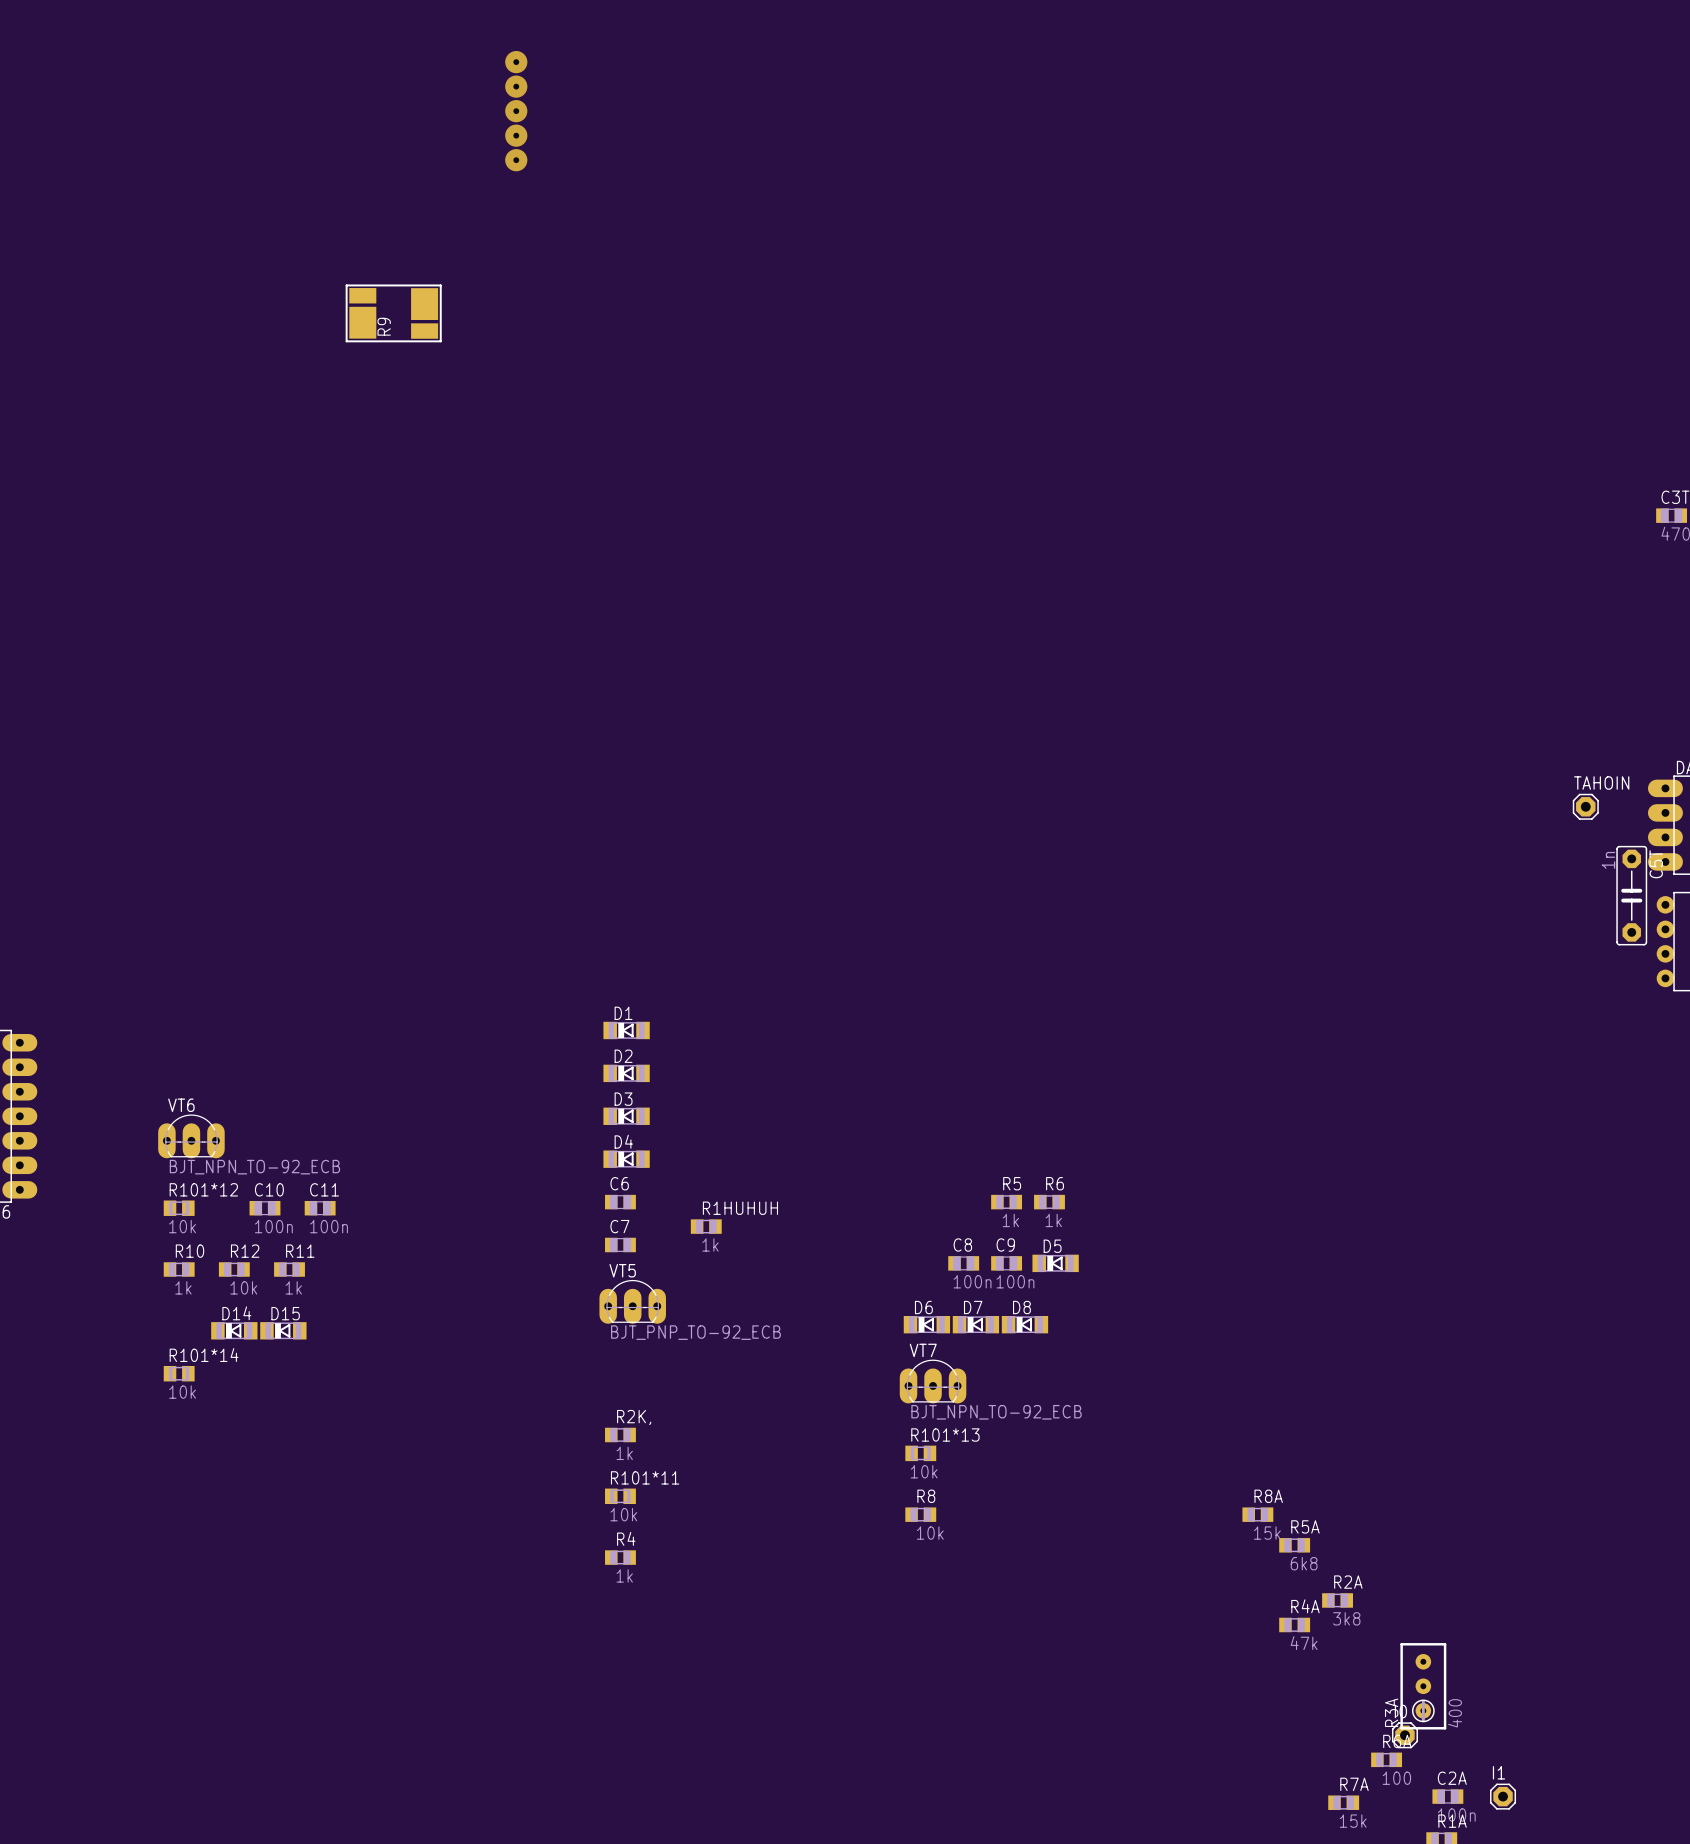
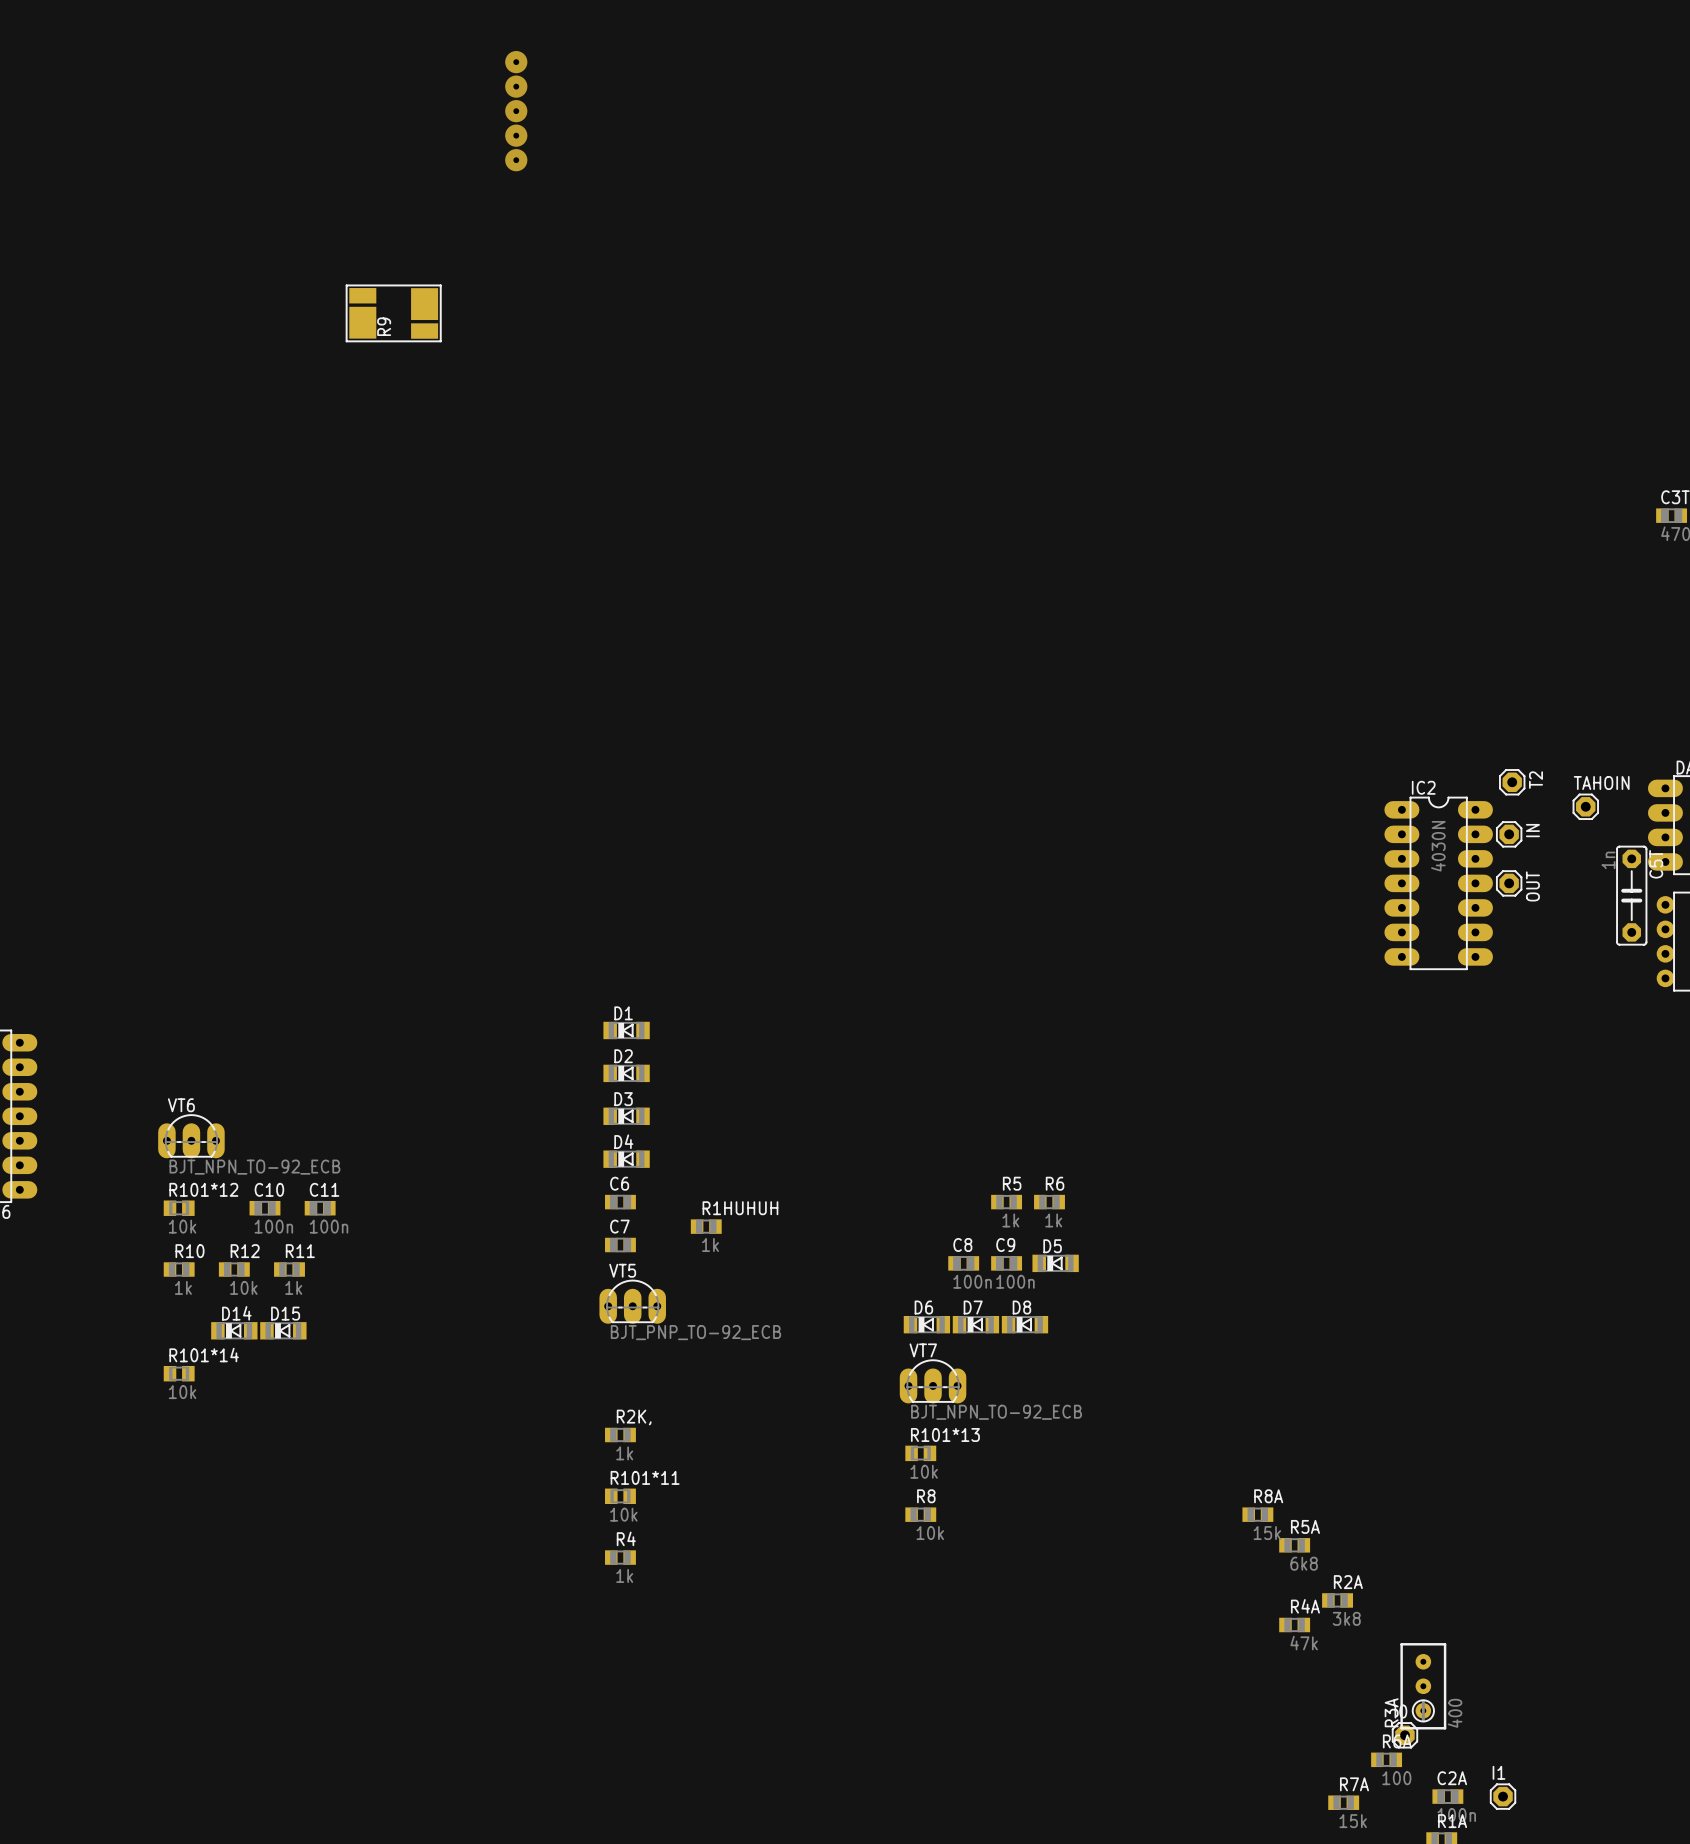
T2: none -> (1512, 782)
IN: none -> (1509, 834)
IC2: none -> 4030N (1438, 883)
OUT: none -> (1509, 883)

